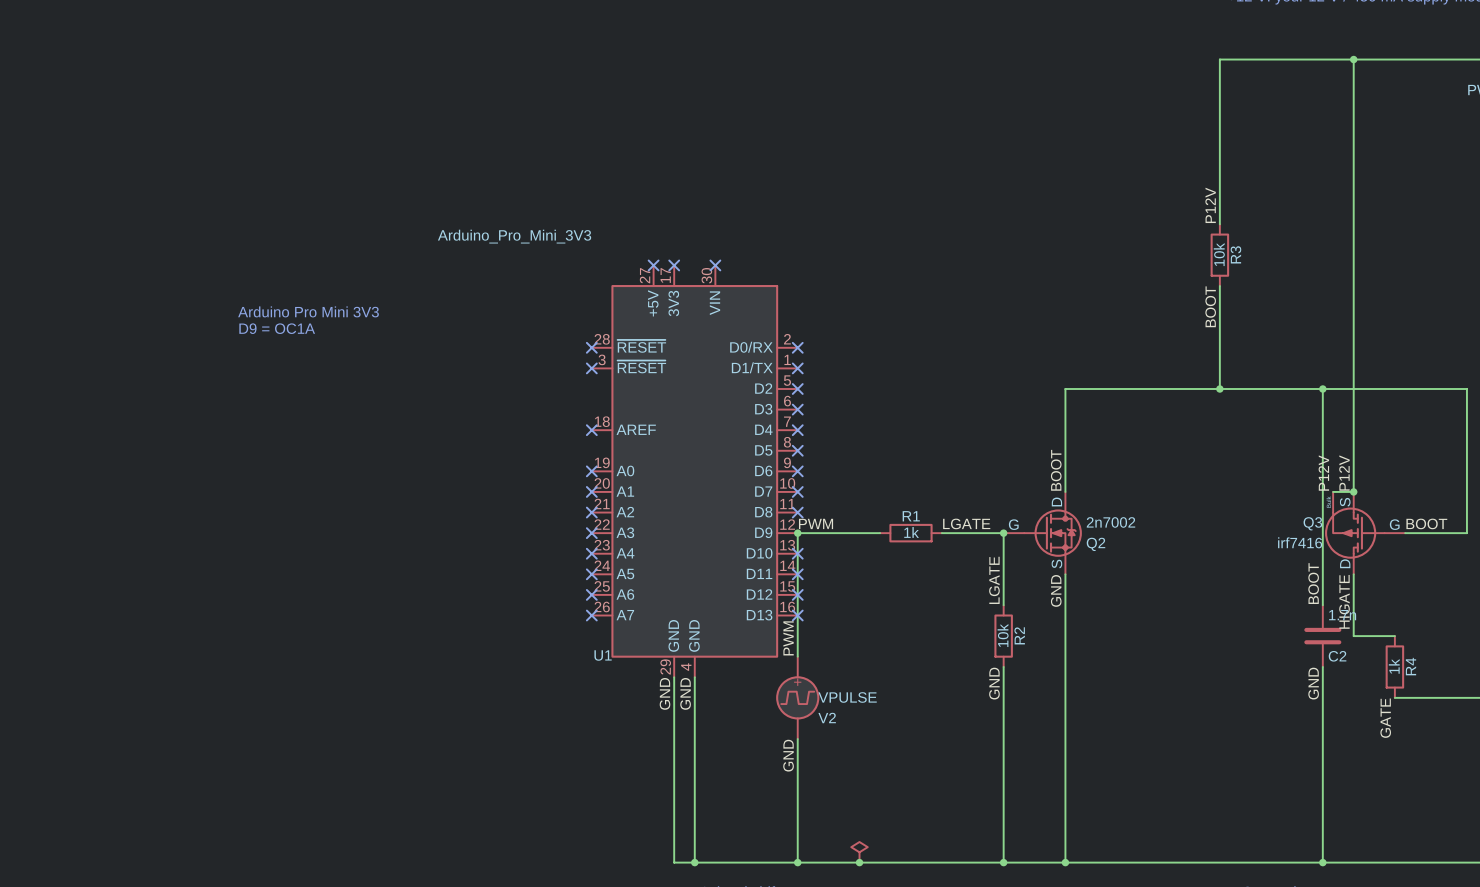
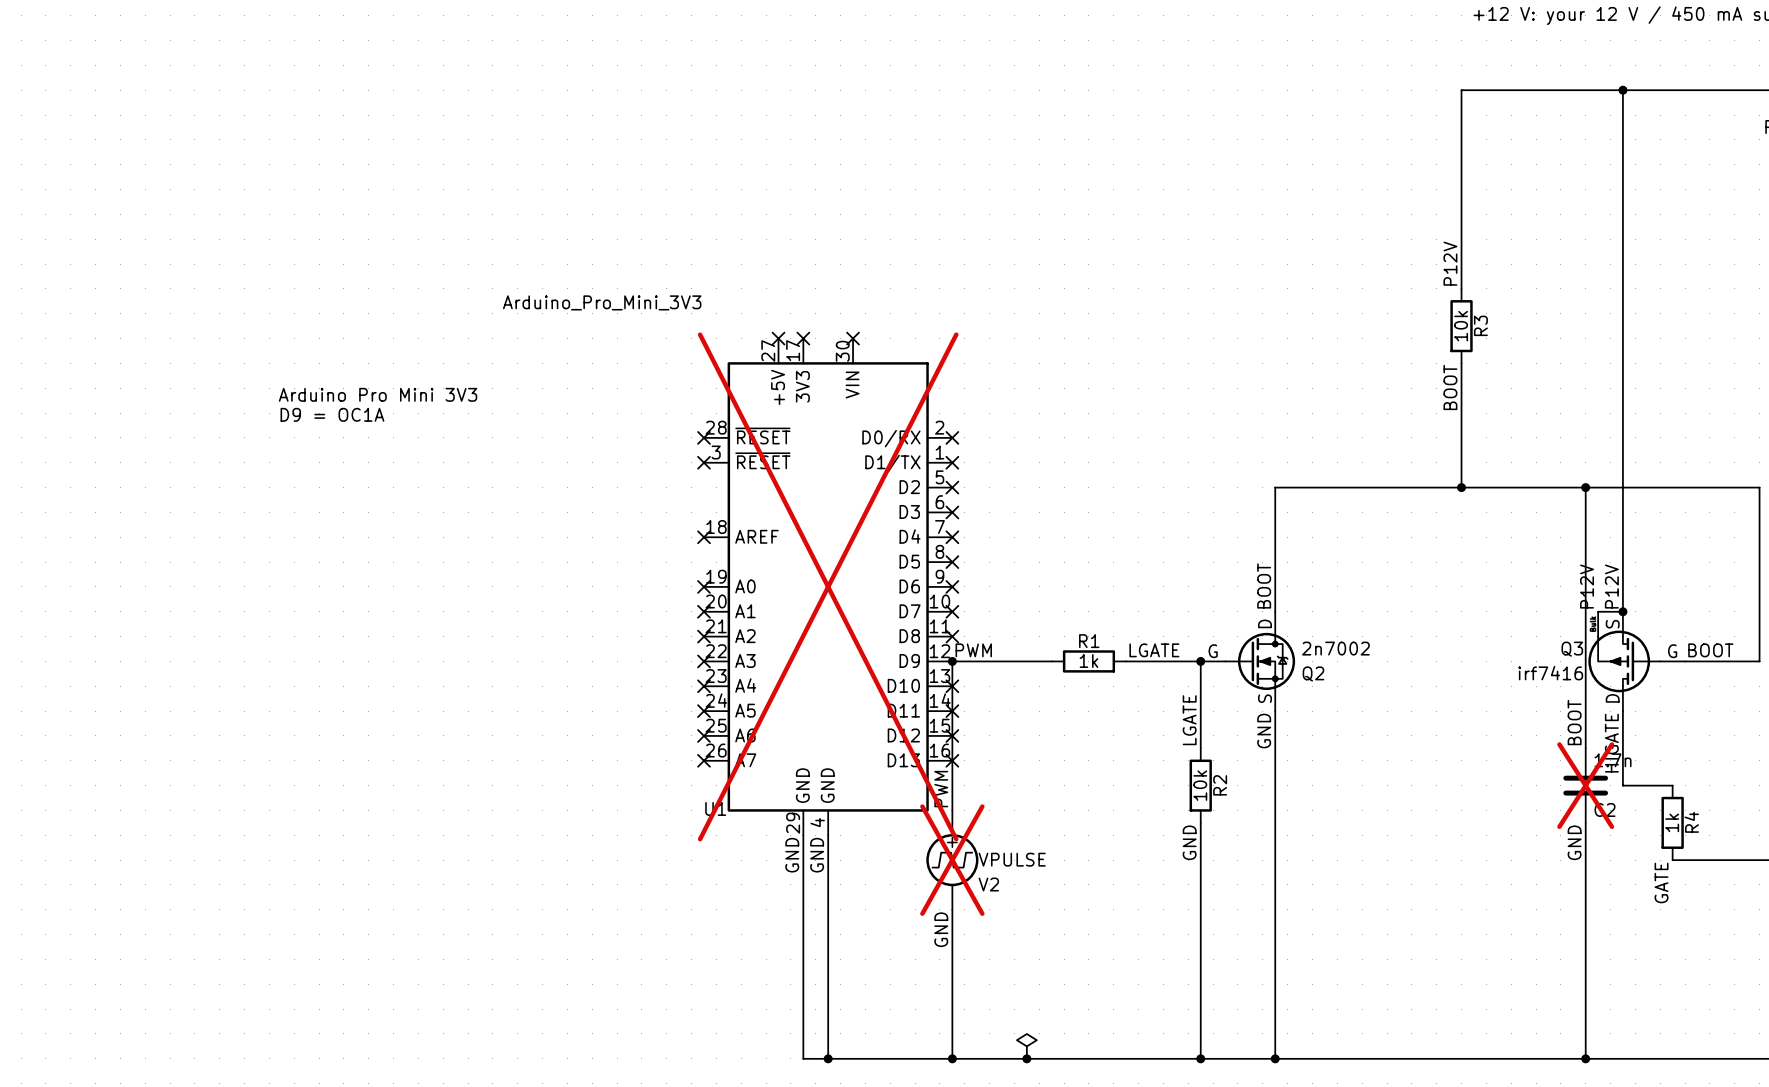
U1 do-not-place cross: none -> (828, 586)
C2 do-not-place cross: none -> (1585, 785)
V2 do-not-place cross: none -> (952, 860)

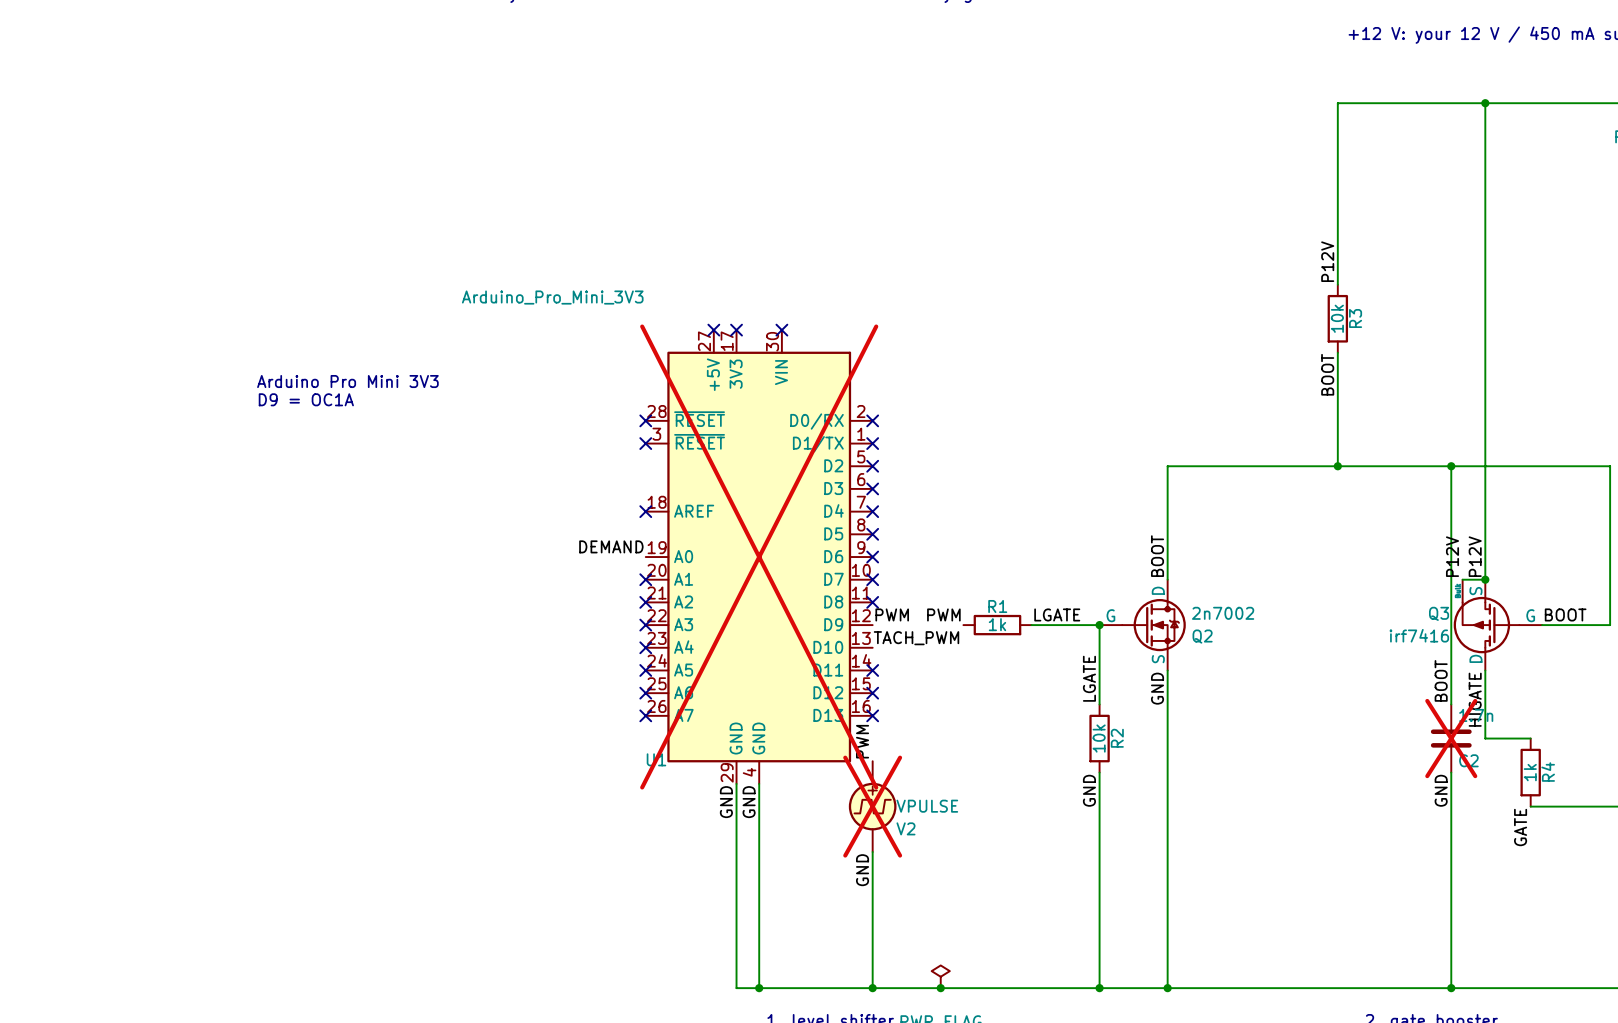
label: none -> DEMAND (611, 546)
no-connect mark: (704, 586) -> none
label: none -> PWM (943, 614)
junction: (952, 661) -> none
wire: (1051, 661) (952, 661) (952, 810) -> none
label: none -> TACH_PWM (916, 638)
no-connect mark: (952, 686) -> none

